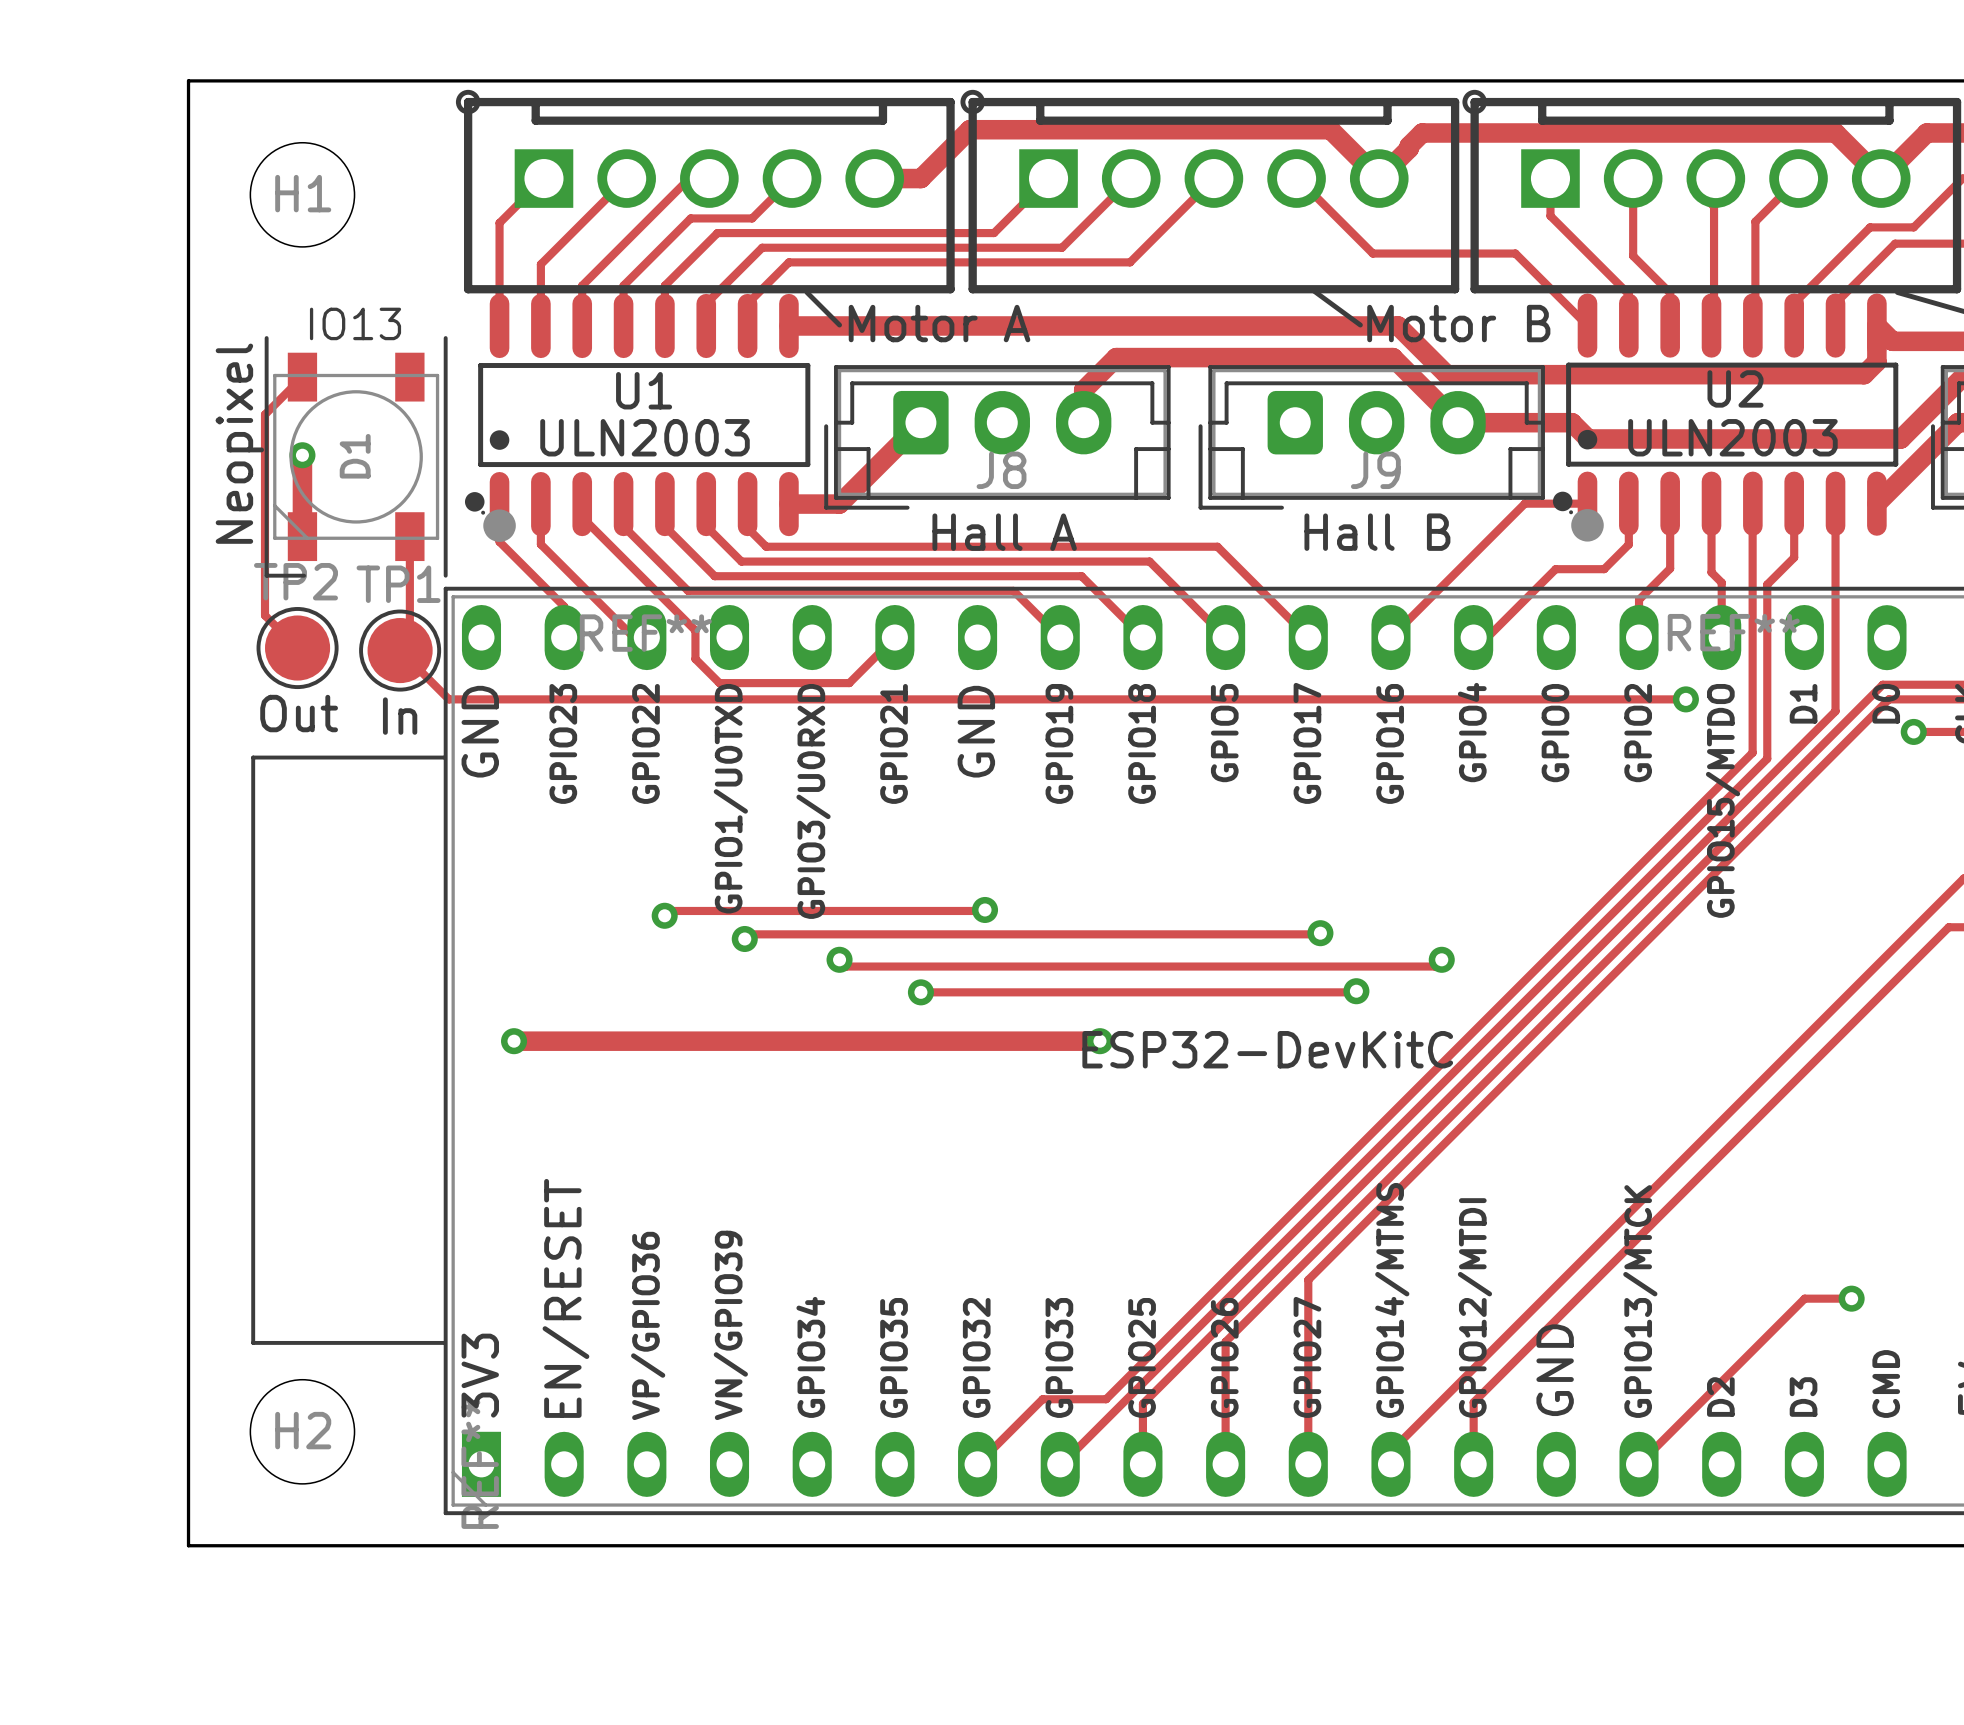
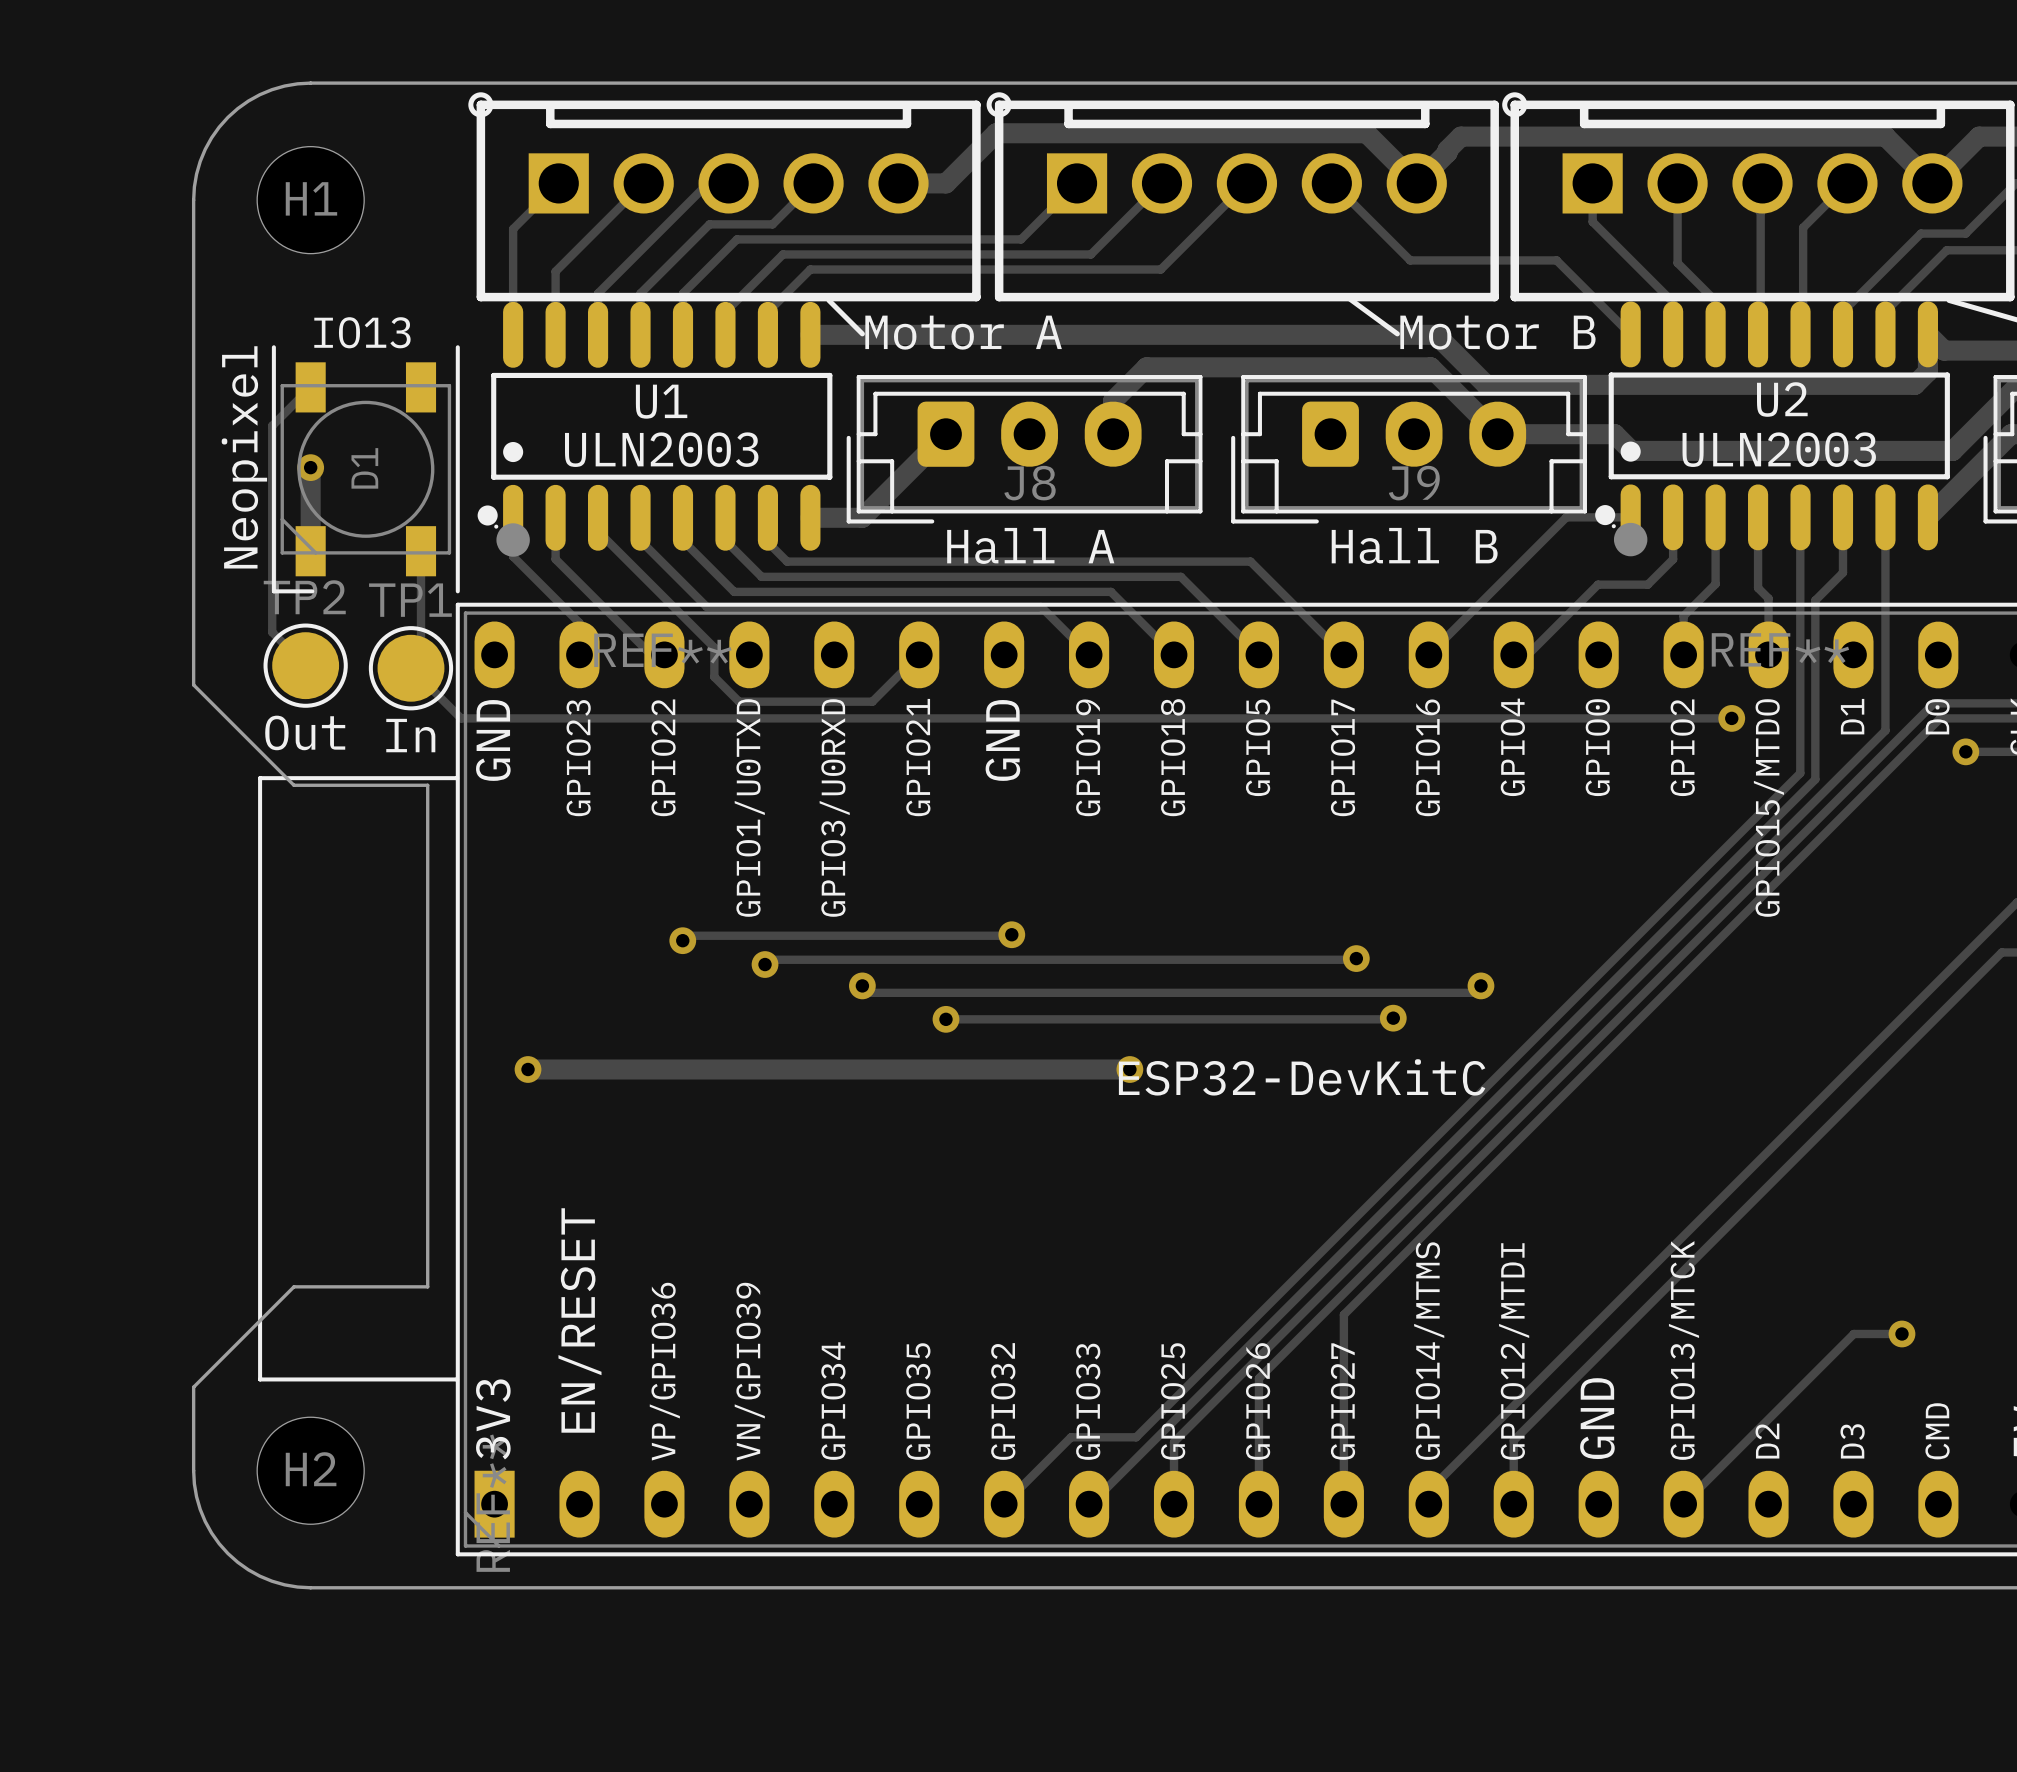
board edge: (302, 80) (188, 80) (188, 194) -> (310, 83) (284, 86) (259, 94) (227, 117) (211, 137) (200, 161) (193, 200)
board edge: (188, 666) (188, 1350) -> (193, 684) (293, 785) (427, 785) (427, 1286) (293, 1286) (193, 1387)
board edge: (188, 1431) (188, 1545) (302, 1545) -> (193, 1470) (196, 1496) (205, 1521) (227, 1553) (259, 1576) (284, 1584) (310, 1587)

